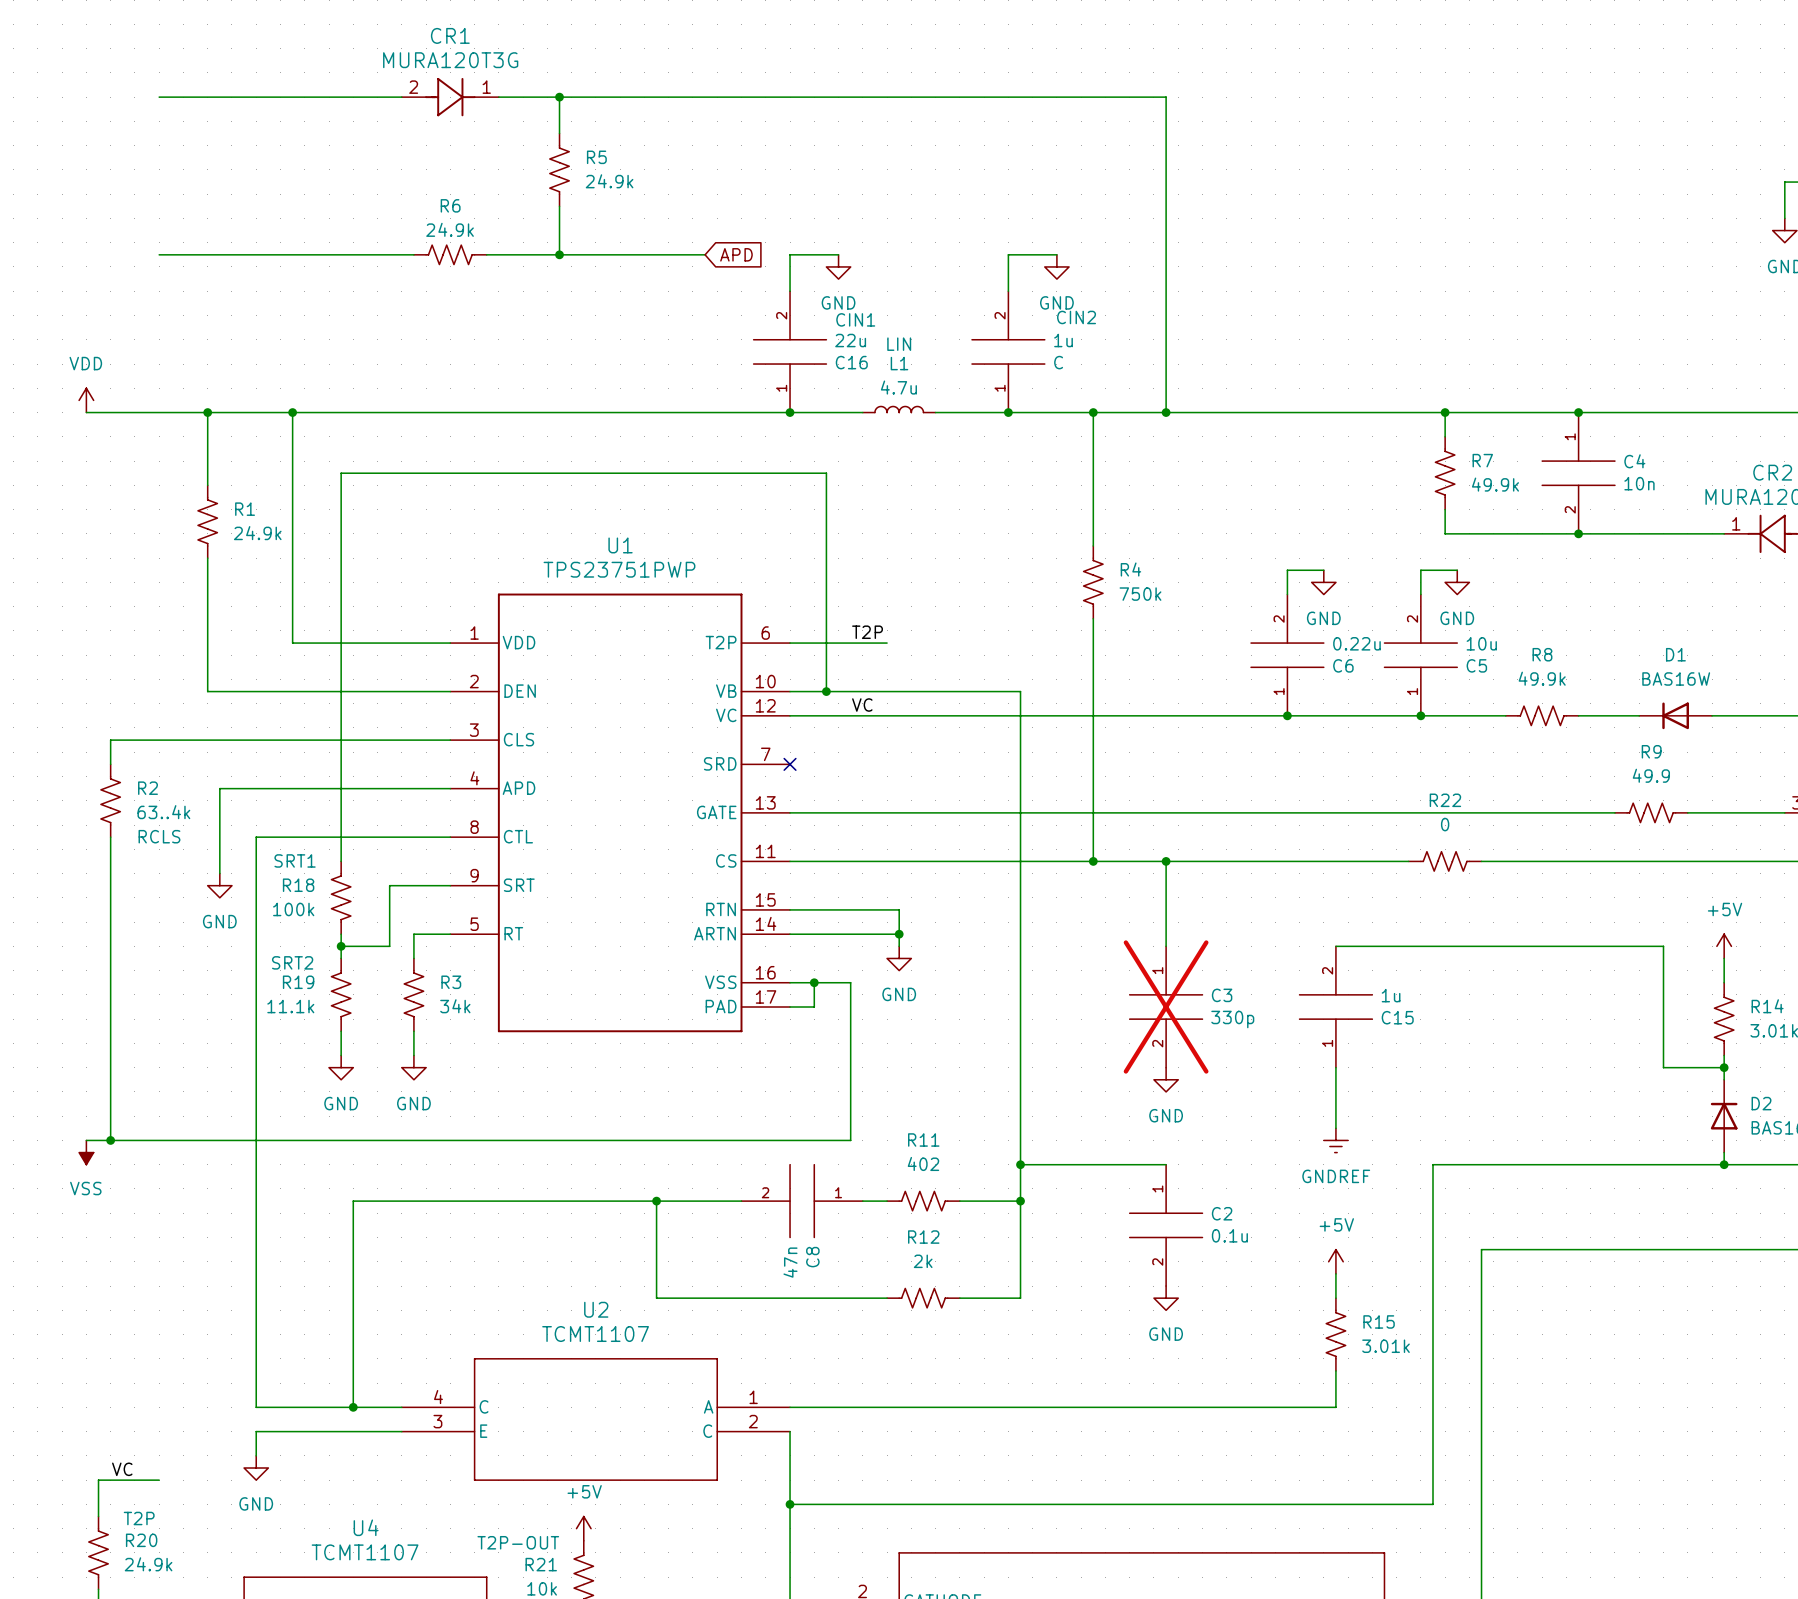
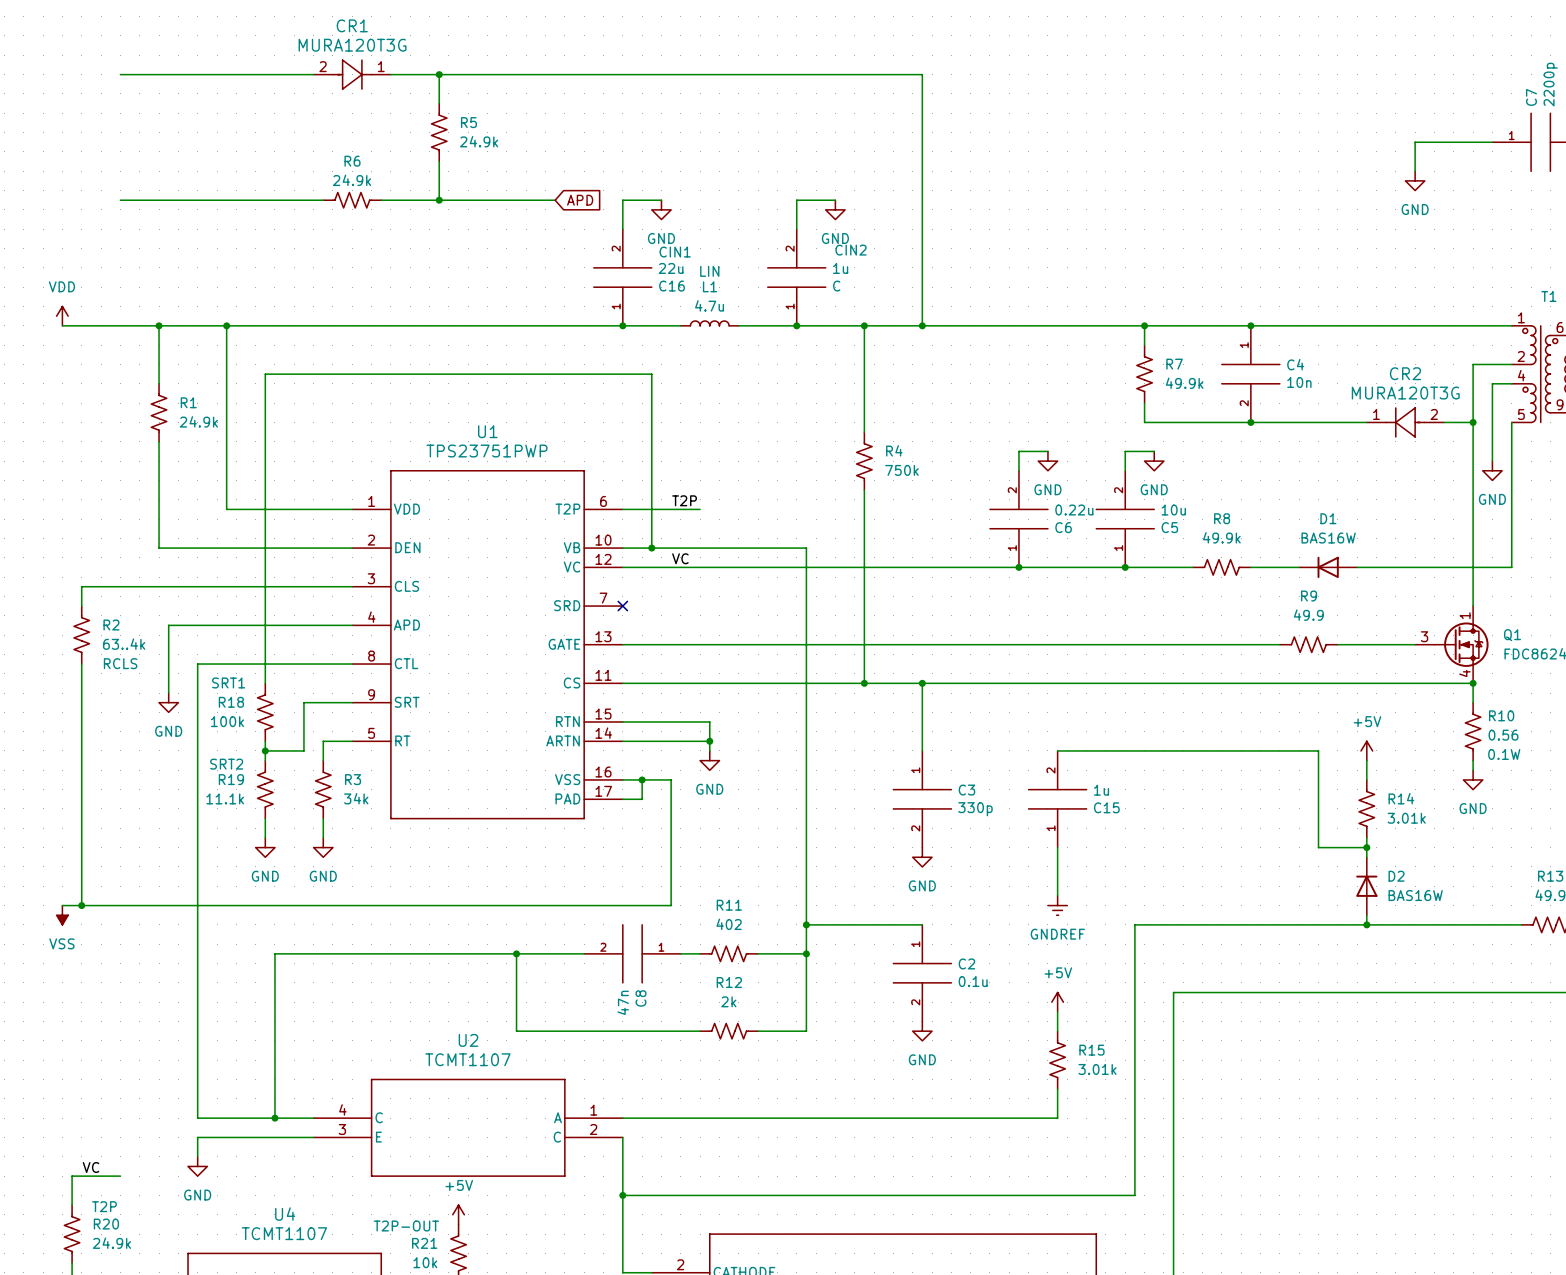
R22: 0 (1445, 861) -> none
C3 do-not-place cross: (1166, 1007) -> none

